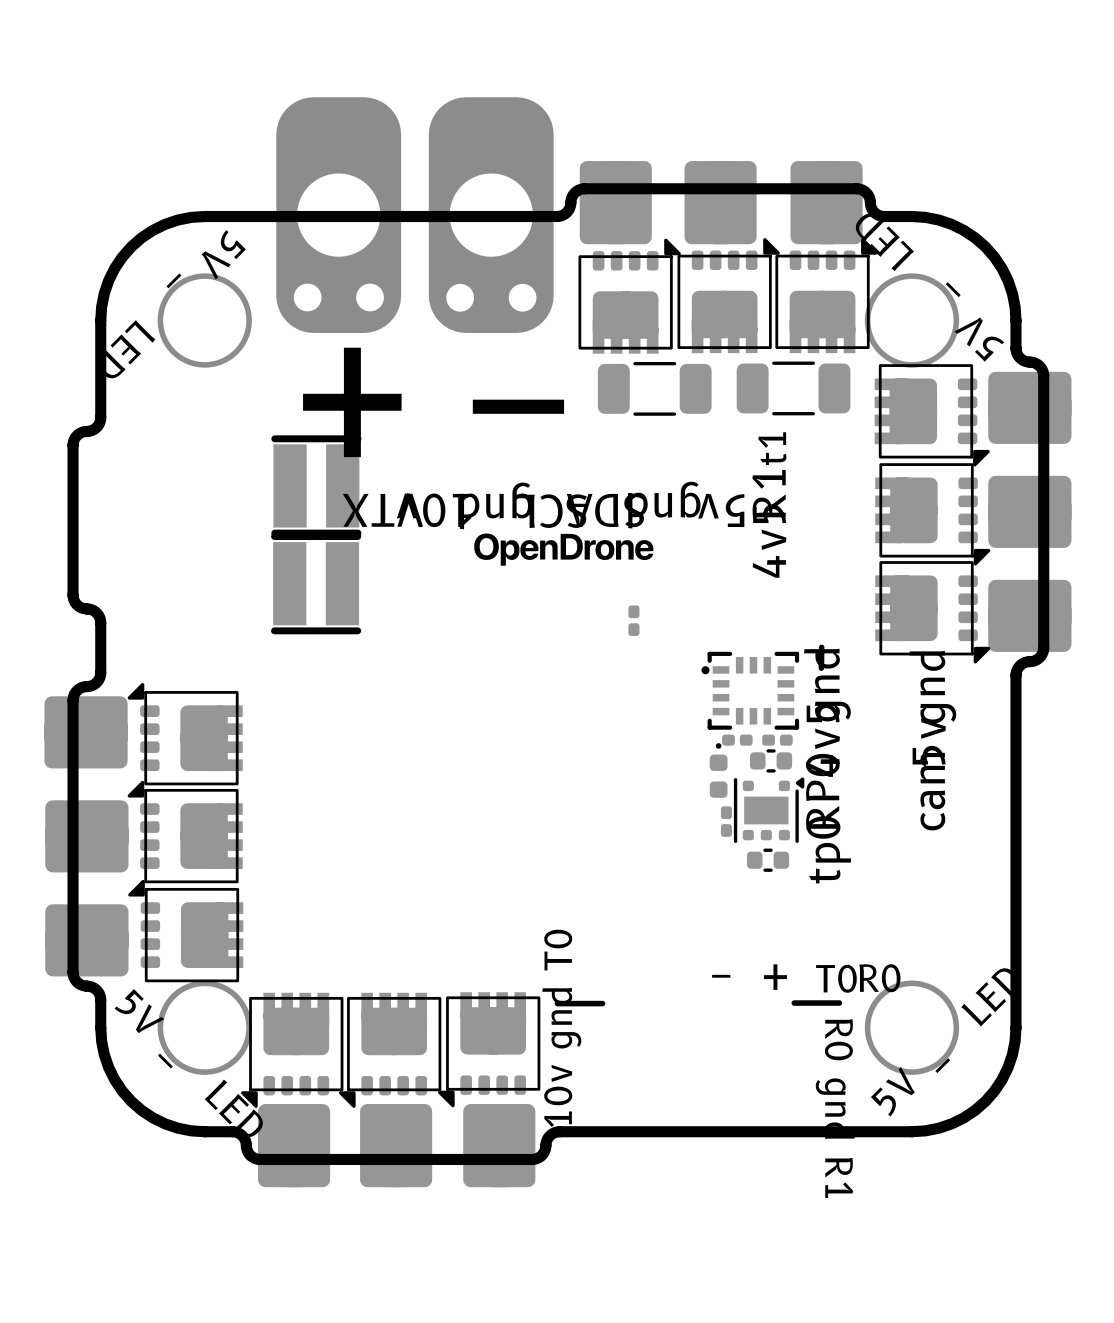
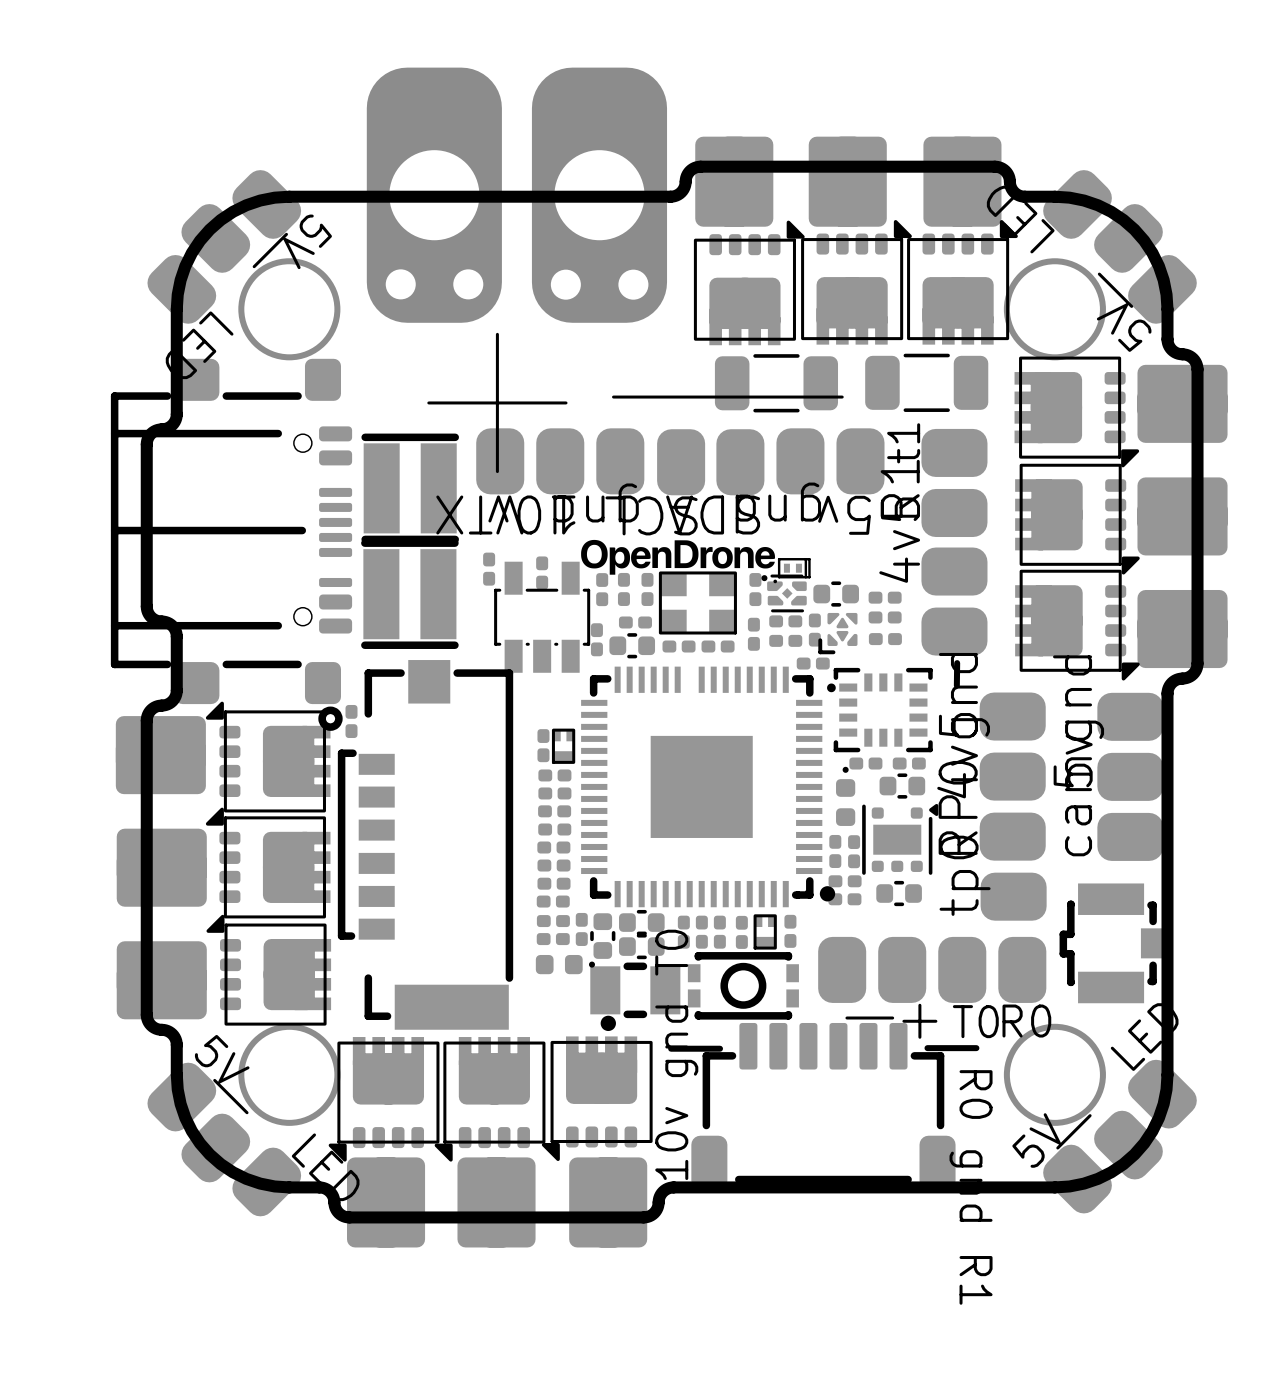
part: none -> (266, 204)
part: none -> (1077, 204)
part: none -> (215, 238)
part: none -> (1128, 238)
part: none -> (181, 289)
part: none -> (1162, 289)
part: none -> (954, 452)
part: none -> (500, 461)
part: none -> (560, 461)
part: none -> (620, 461)
part: none -> (800, 461)
part: none -> (860, 461)
part: none -> (681, 462)
part: none -> (740, 462)
part: none -> (954, 512)
part: none -> (231, 531)
part: none -> (794, 568)
part: none -> (489, 569)
part: none -> (954, 571)
part: none -> (542, 572)
part: none -> (602, 589)
part: none -> (623, 589)
part: none -> (647, 589)
part: none -> (755, 589)
part: none -> (784, 593)
part: none -> (836, 594)
part: none -> (885, 597)
part: none -> (697, 602)
part: none -> (542, 617)
part: none -> (885, 617)
part: none -> (785, 621)
part: none -> (635, 622)
part: none -> (814, 630)
part: none -> (954, 631)
part: none -> (837, 633)
part: none -> (596, 639)
part: none -> (885, 639)
part: none -> (785, 640)
part: none -> (632, 645)
part: none -> (679, 646)
part: none -> (718, 646)
part: none -> (813, 663)
part: none -> (1012, 716)
part: none -> (1130, 716)
part: none -> (351, 721)
part: none -> (543, 745)
part: none -> (563, 746)
part: none -> (554, 775)
part: none -> (1012, 776)
part: none -> (1130, 776)
part: none -> (708, 786)
part: none -> (554, 793)
part: none -> (554, 811)
part: none -> (554, 829)
part: none -> (1012, 836)
part: none -> (1130, 836)
part: none -> (415, 844)
part: none -> (553, 847)
part: none -> (835, 851)
part: none -> (554, 865)
part: none -> (845, 881)
part: none -> (554, 883)
part: none -> (1013, 896)
part: none -> (844, 899)
part: none -> (553, 901)
part: none -> (553, 921)
part: none -> (641, 922)
part: none -> (581, 929)
part: none -> (683, 932)
part: none -> (701, 932)
part: none -> (719, 932)
part: none -> (765, 931)
part: none -> (790, 931)
part: none -> (741, 932)
part: none -> (602, 936)
part: none -> (553, 939)
part: none -> (1116, 943)
part: none -> (641, 946)
part: none -> (565, 964)
part: none -> (842, 969)
part: none -> (902, 969)
part: none -> (962, 969)
part: none -> (1022, 969)
part: none -> (743, 985)
part: none -> (635, 996)
part: none -> (1162, 1094)
part: none -> (181, 1097)
part: none -> (823, 1106)
part: none -> (1128, 1145)
part: none -> (215, 1148)
part: none -> (1077, 1179)
part: none -> (266, 1181)

